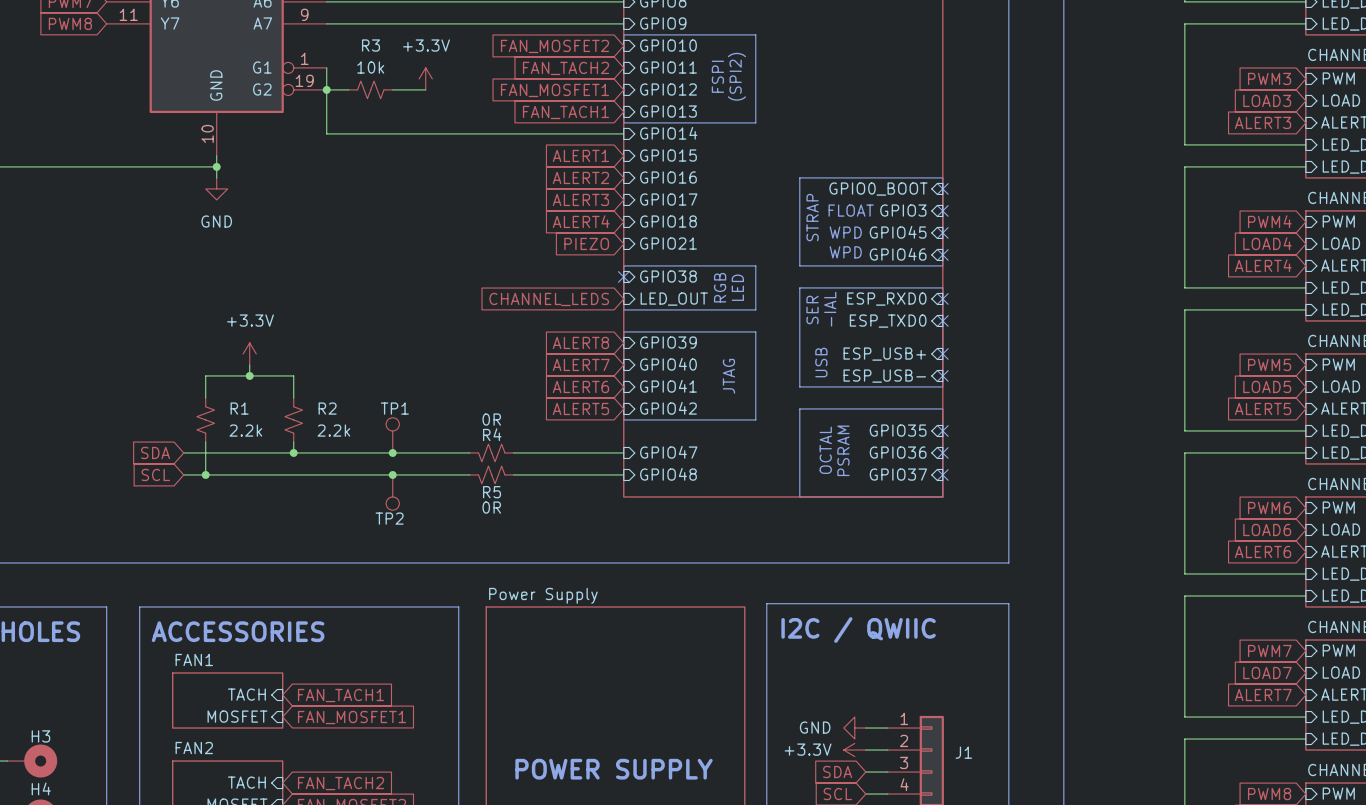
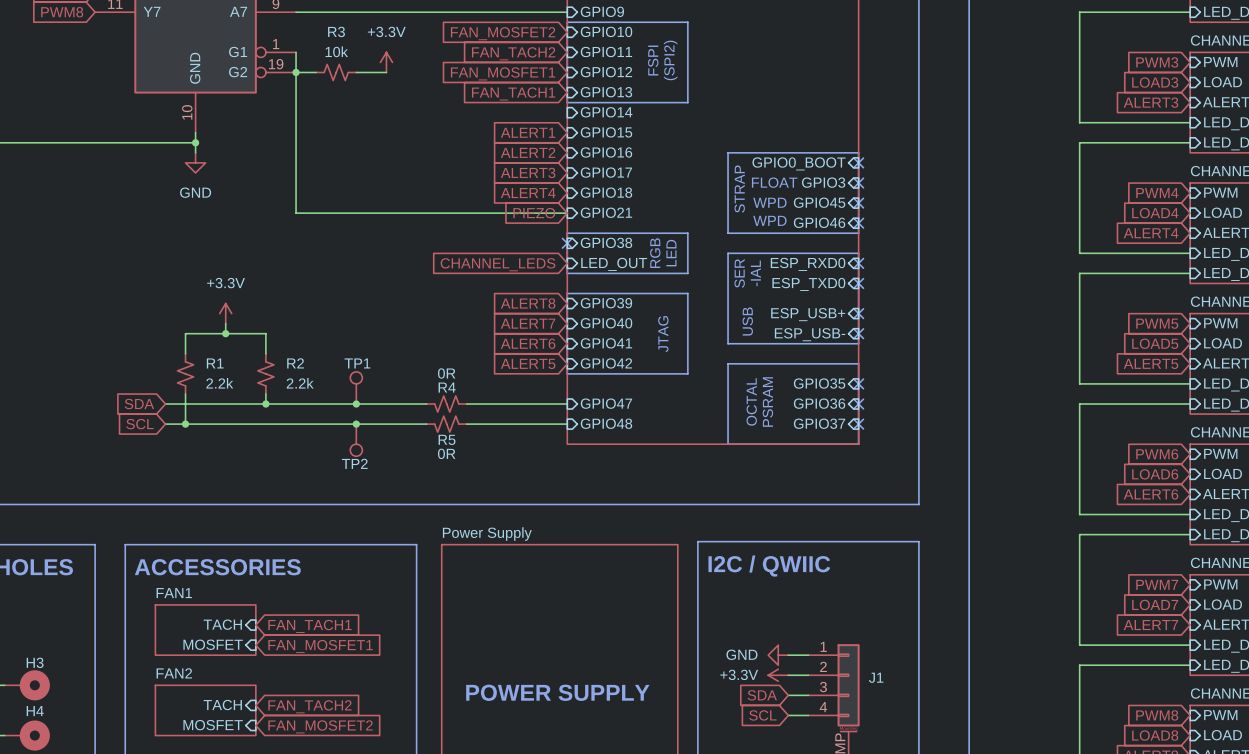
wire: (326, 133) (623, 133) -> (296, 112) (296, 213) (567, 213)

